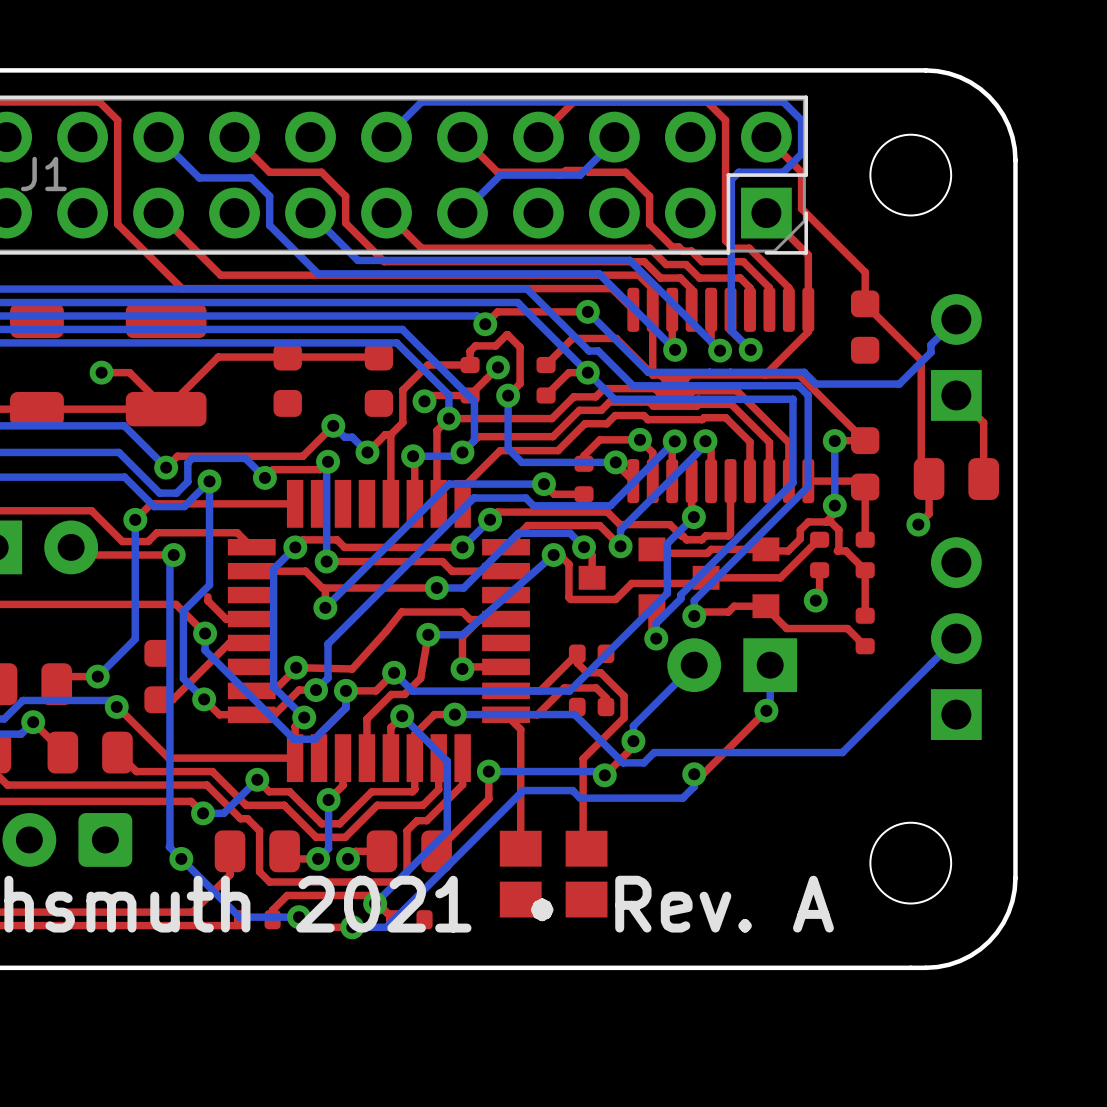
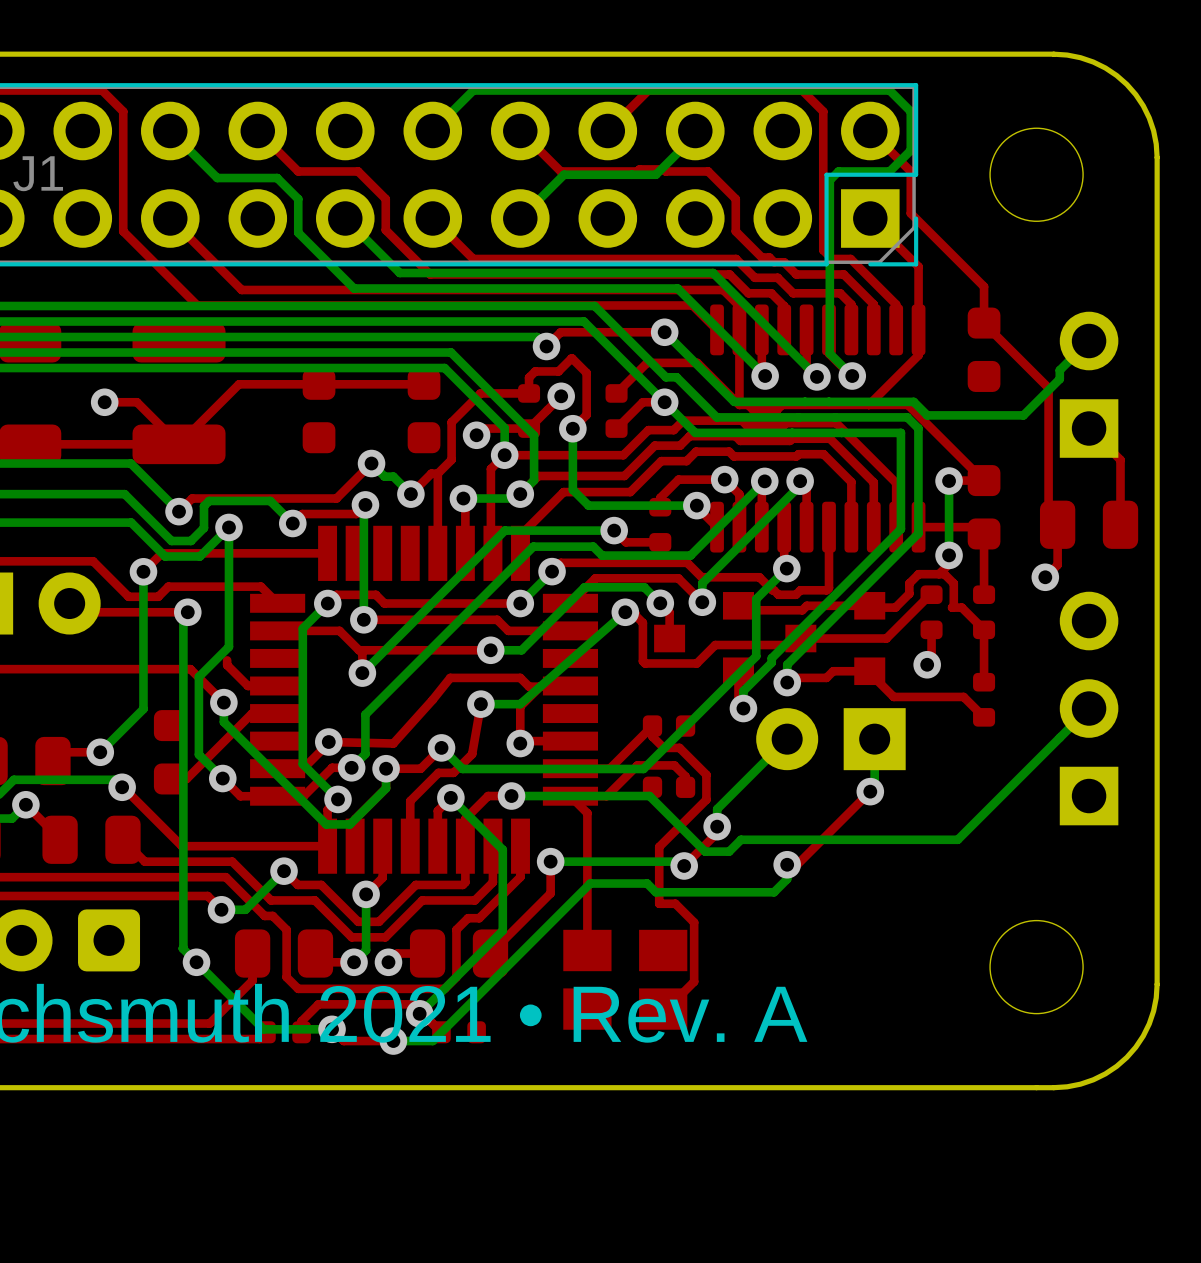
top track: (583, 808) (583, 845) -> (659, 903) (675, 903) (694, 922) (694, 981) (668, 1007)

